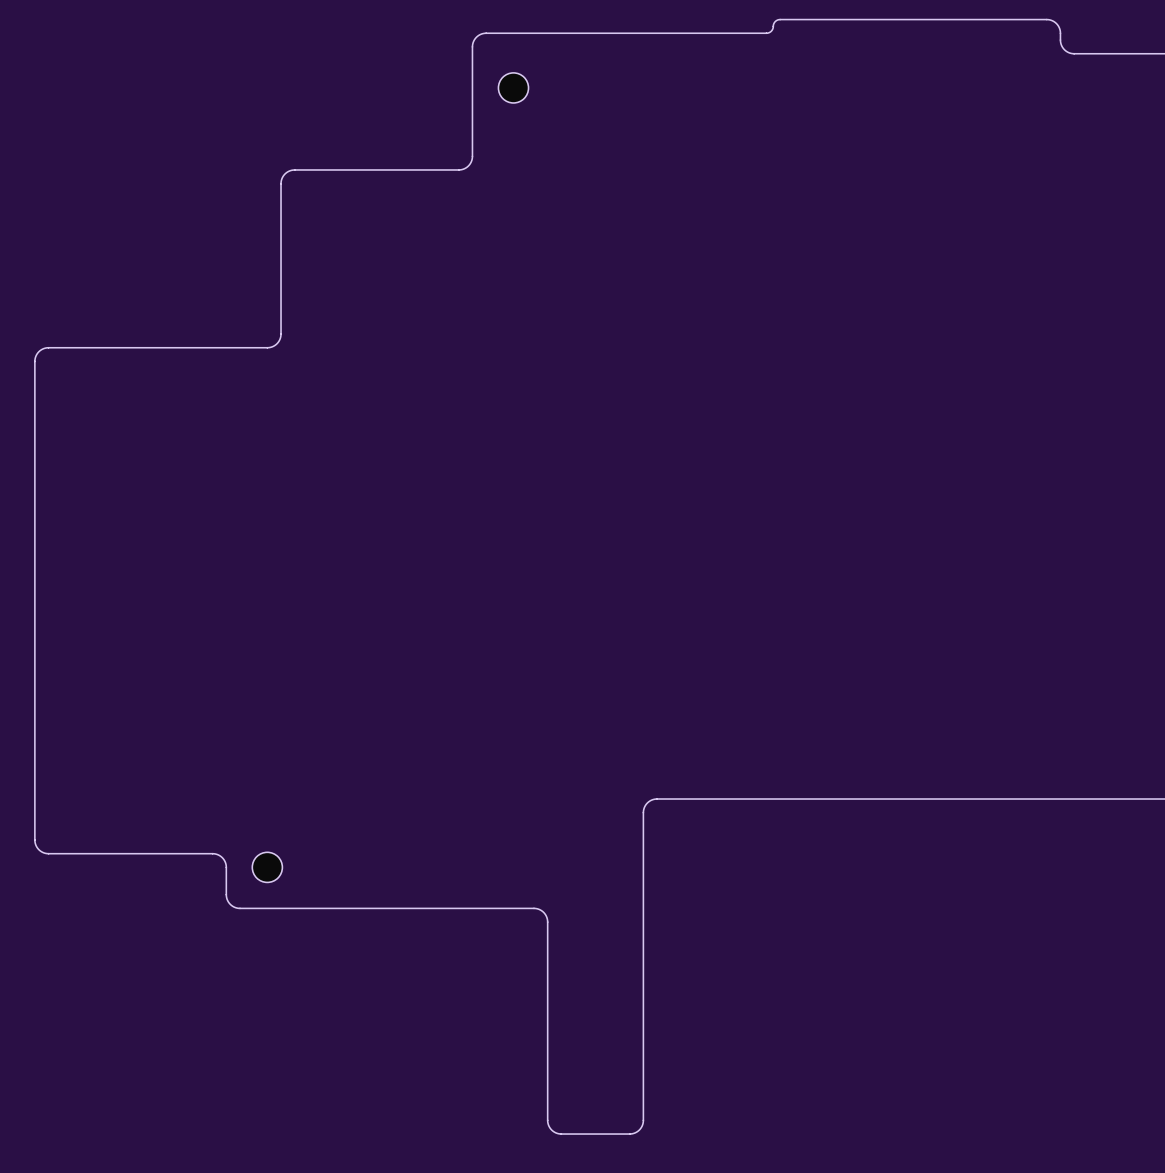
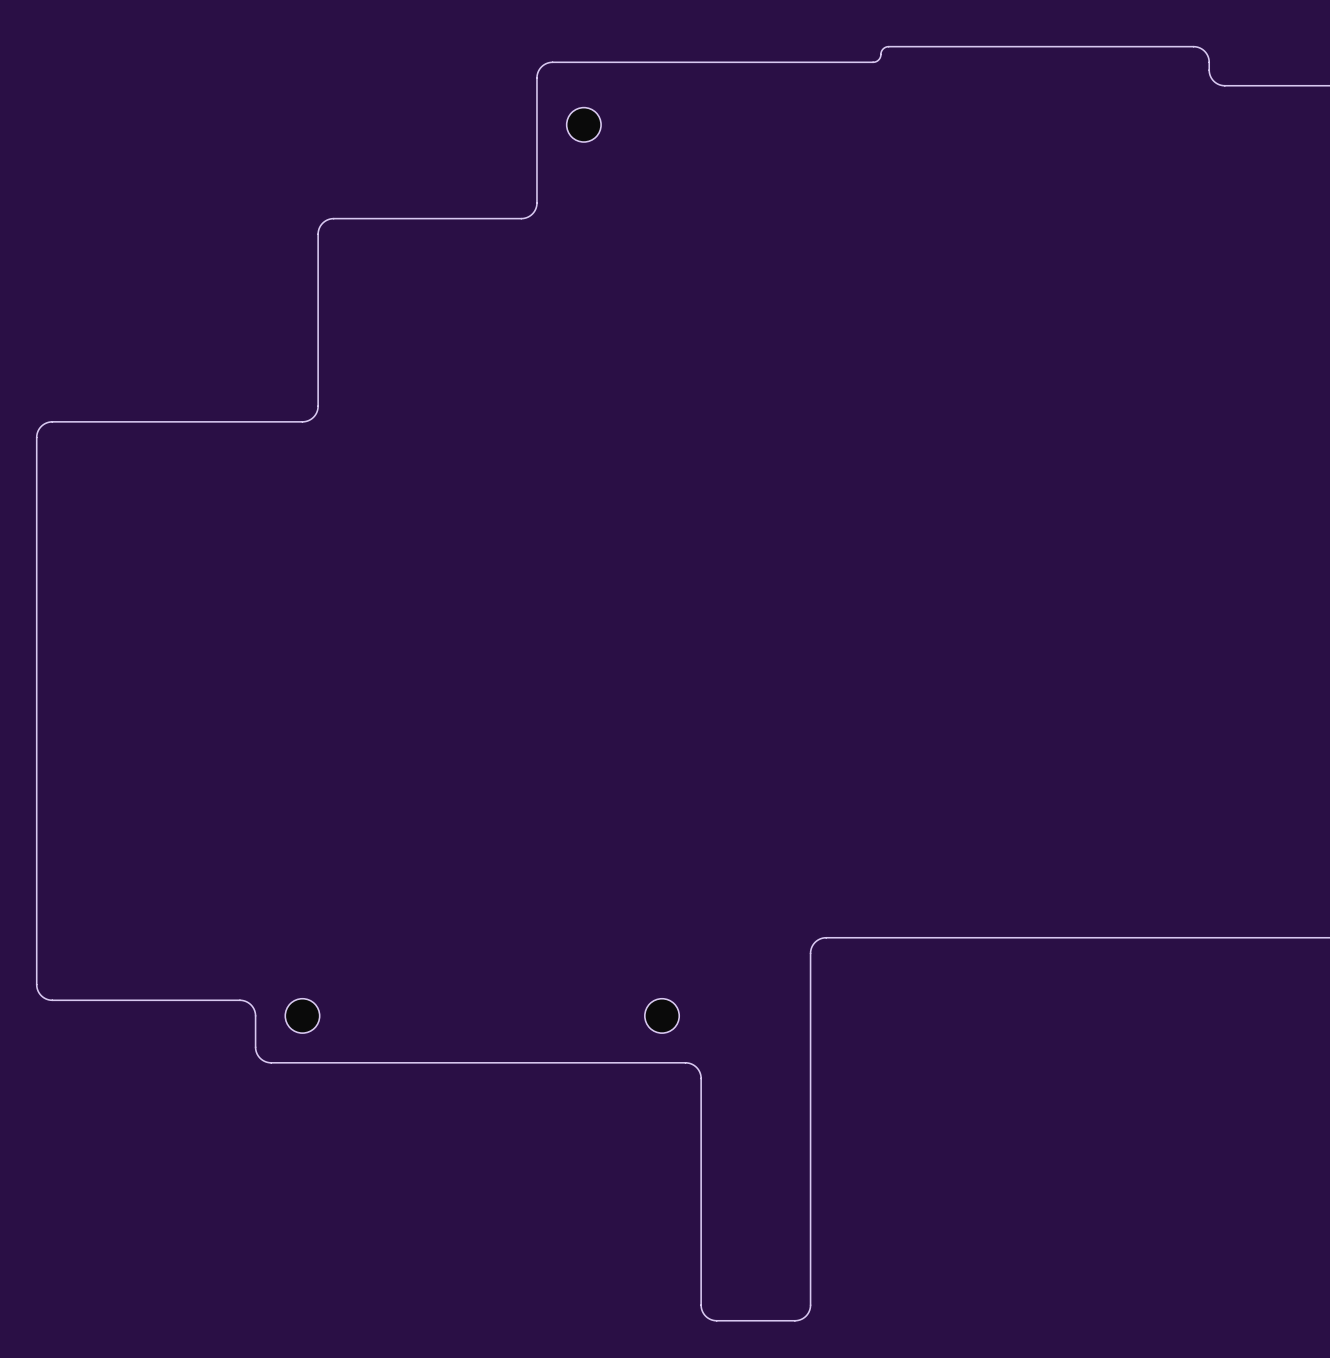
board edge: (725, 799) (655, 799) (647, 803) (643, 809) (643, 1120) (641, 1127) (635, 1132) (559, 1133) (552, 1131) (549, 1126) (547, 920) (543, 912) (533, 908) -> (826, 937) (815, 942) (810, 951) (810, 1305) (809, 1311) (803, 1318) (794, 1320) (716, 1320) (709, 1319) (704, 1314) (701, 1305) (700, 1073) (695, 1066) (687, 1062) (607, 1062)
part: none -> (662, 1015)

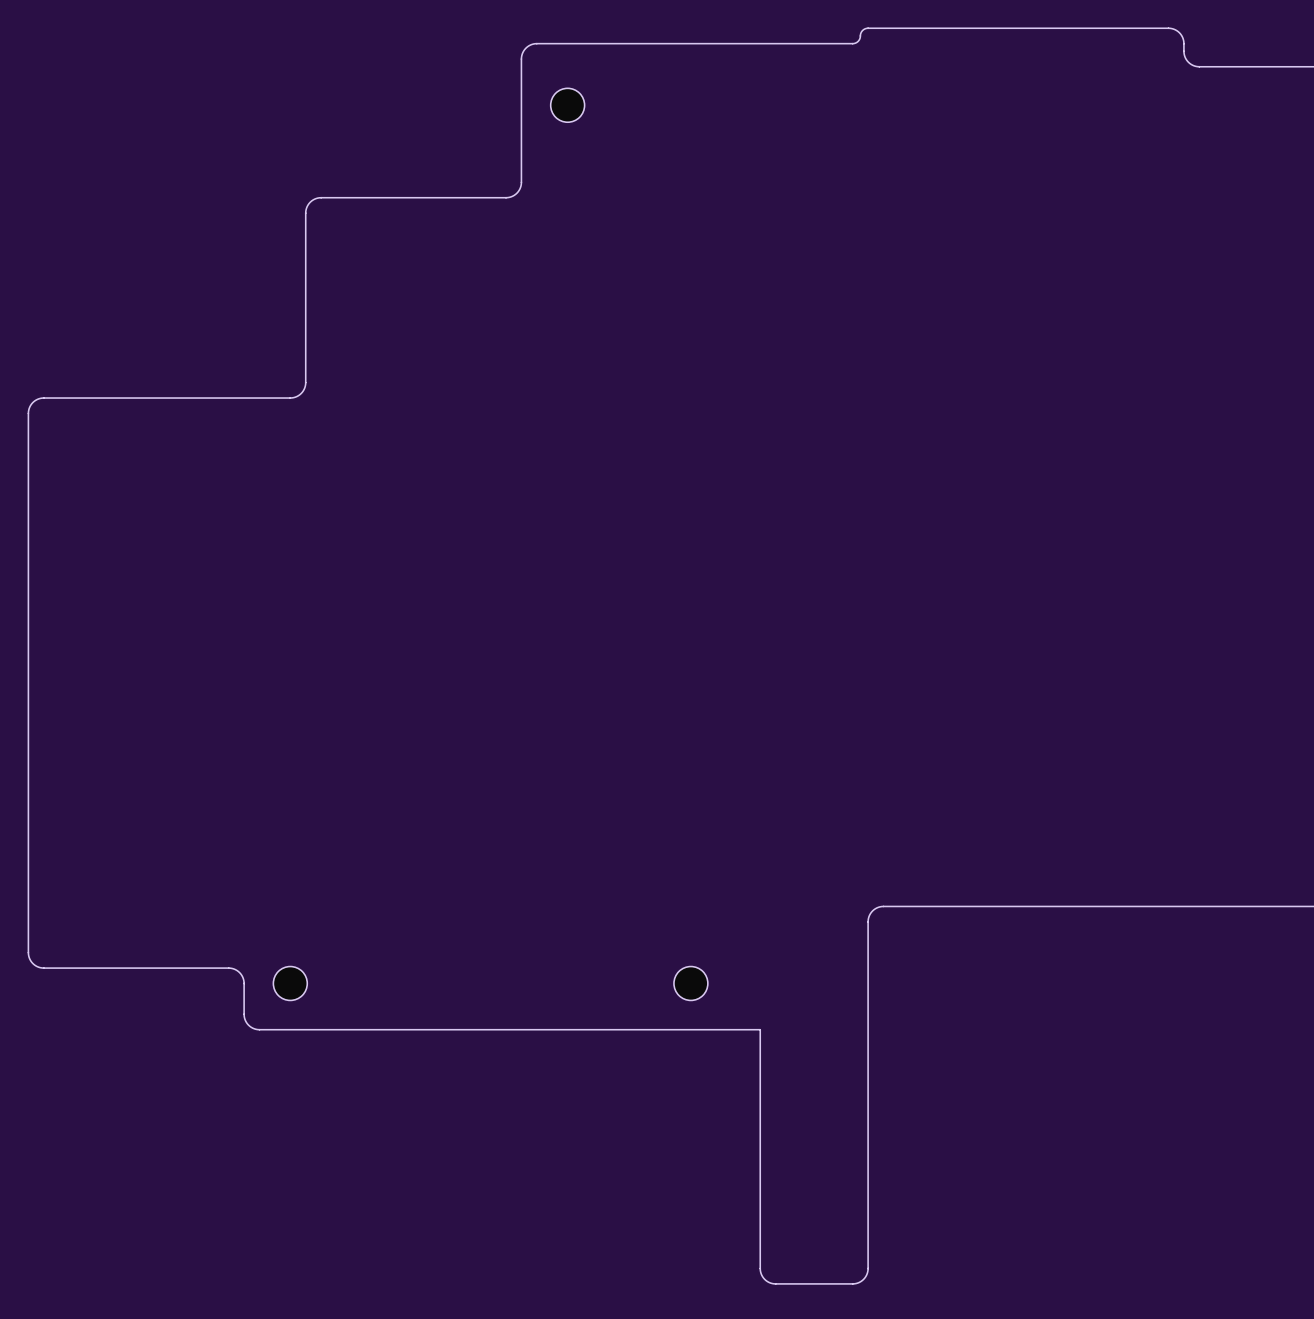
board edge: (904, 937) (824, 937) (815, 942) (810, 949) (810, 1305) (808, 1313) (801, 1319) (715, 1320) (707, 1317) (702, 1311) (701, 1305) (701, 1076) (695, 1066) (685, 1062) -> (883, 906) (872, 910) (868, 920) (868, 1268) (866, 1275) (860, 1281) (852, 1283) (775, 1283) (768, 1282) (763, 1278) (760, 1268) (760, 1029) (667, 1029)
part position: (662, 1015) -> (690, 983)

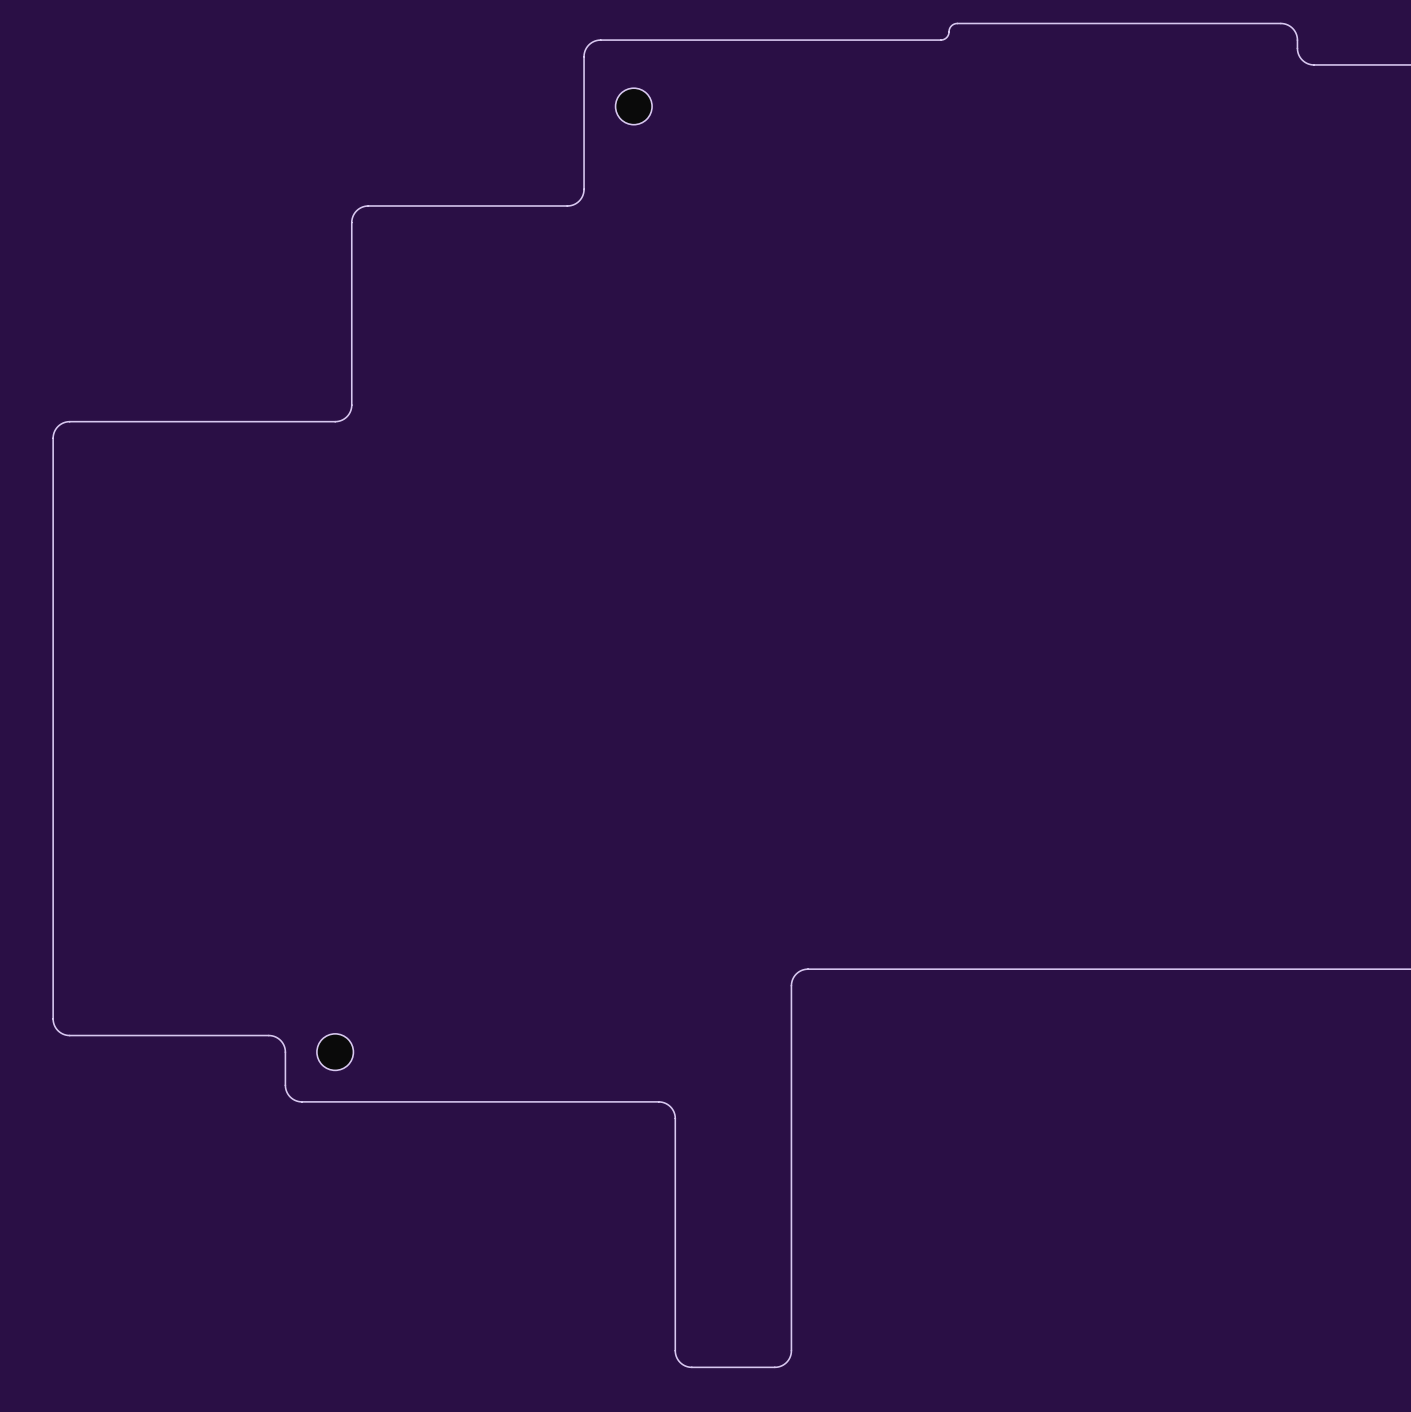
board edge: (883, 906) (872, 910) (868, 920) (868, 1268) (865, 1276) (859, 1282) (773, 1283) (766, 1280) (761, 1273) (760, 1029) (590, 1029) -> (973, 969) (808, 969) (799, 971) (793, 978) (791, 985) (791, 1350) (788, 1359) (782, 1365) (774, 1367) (690, 1367) (683, 1364) (676, 1357) (675, 1350) (675, 1116) (670, 1106) (658, 1101)
part: (690, 983) -> none

